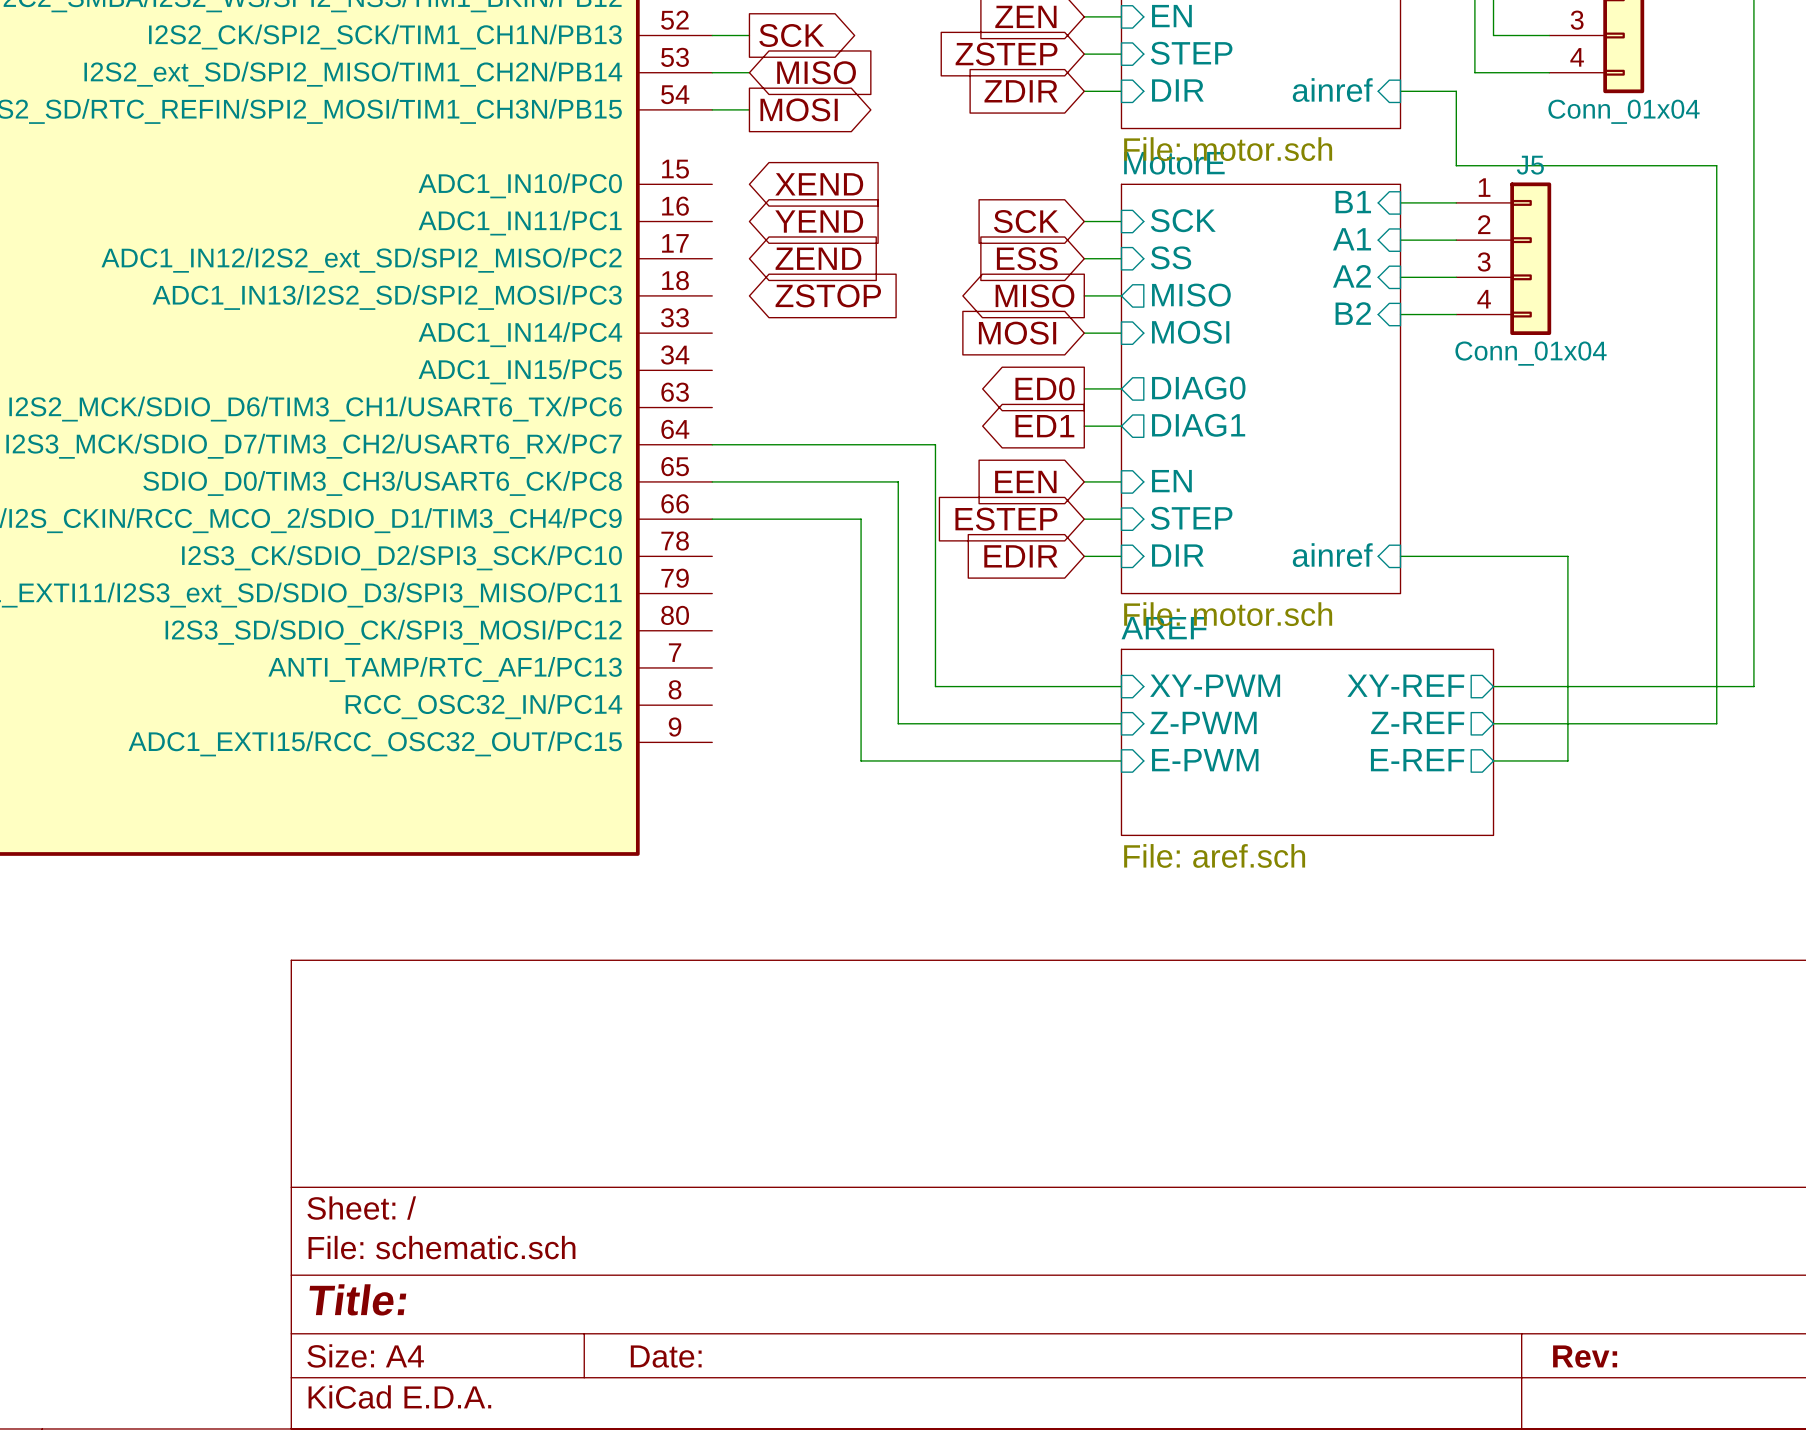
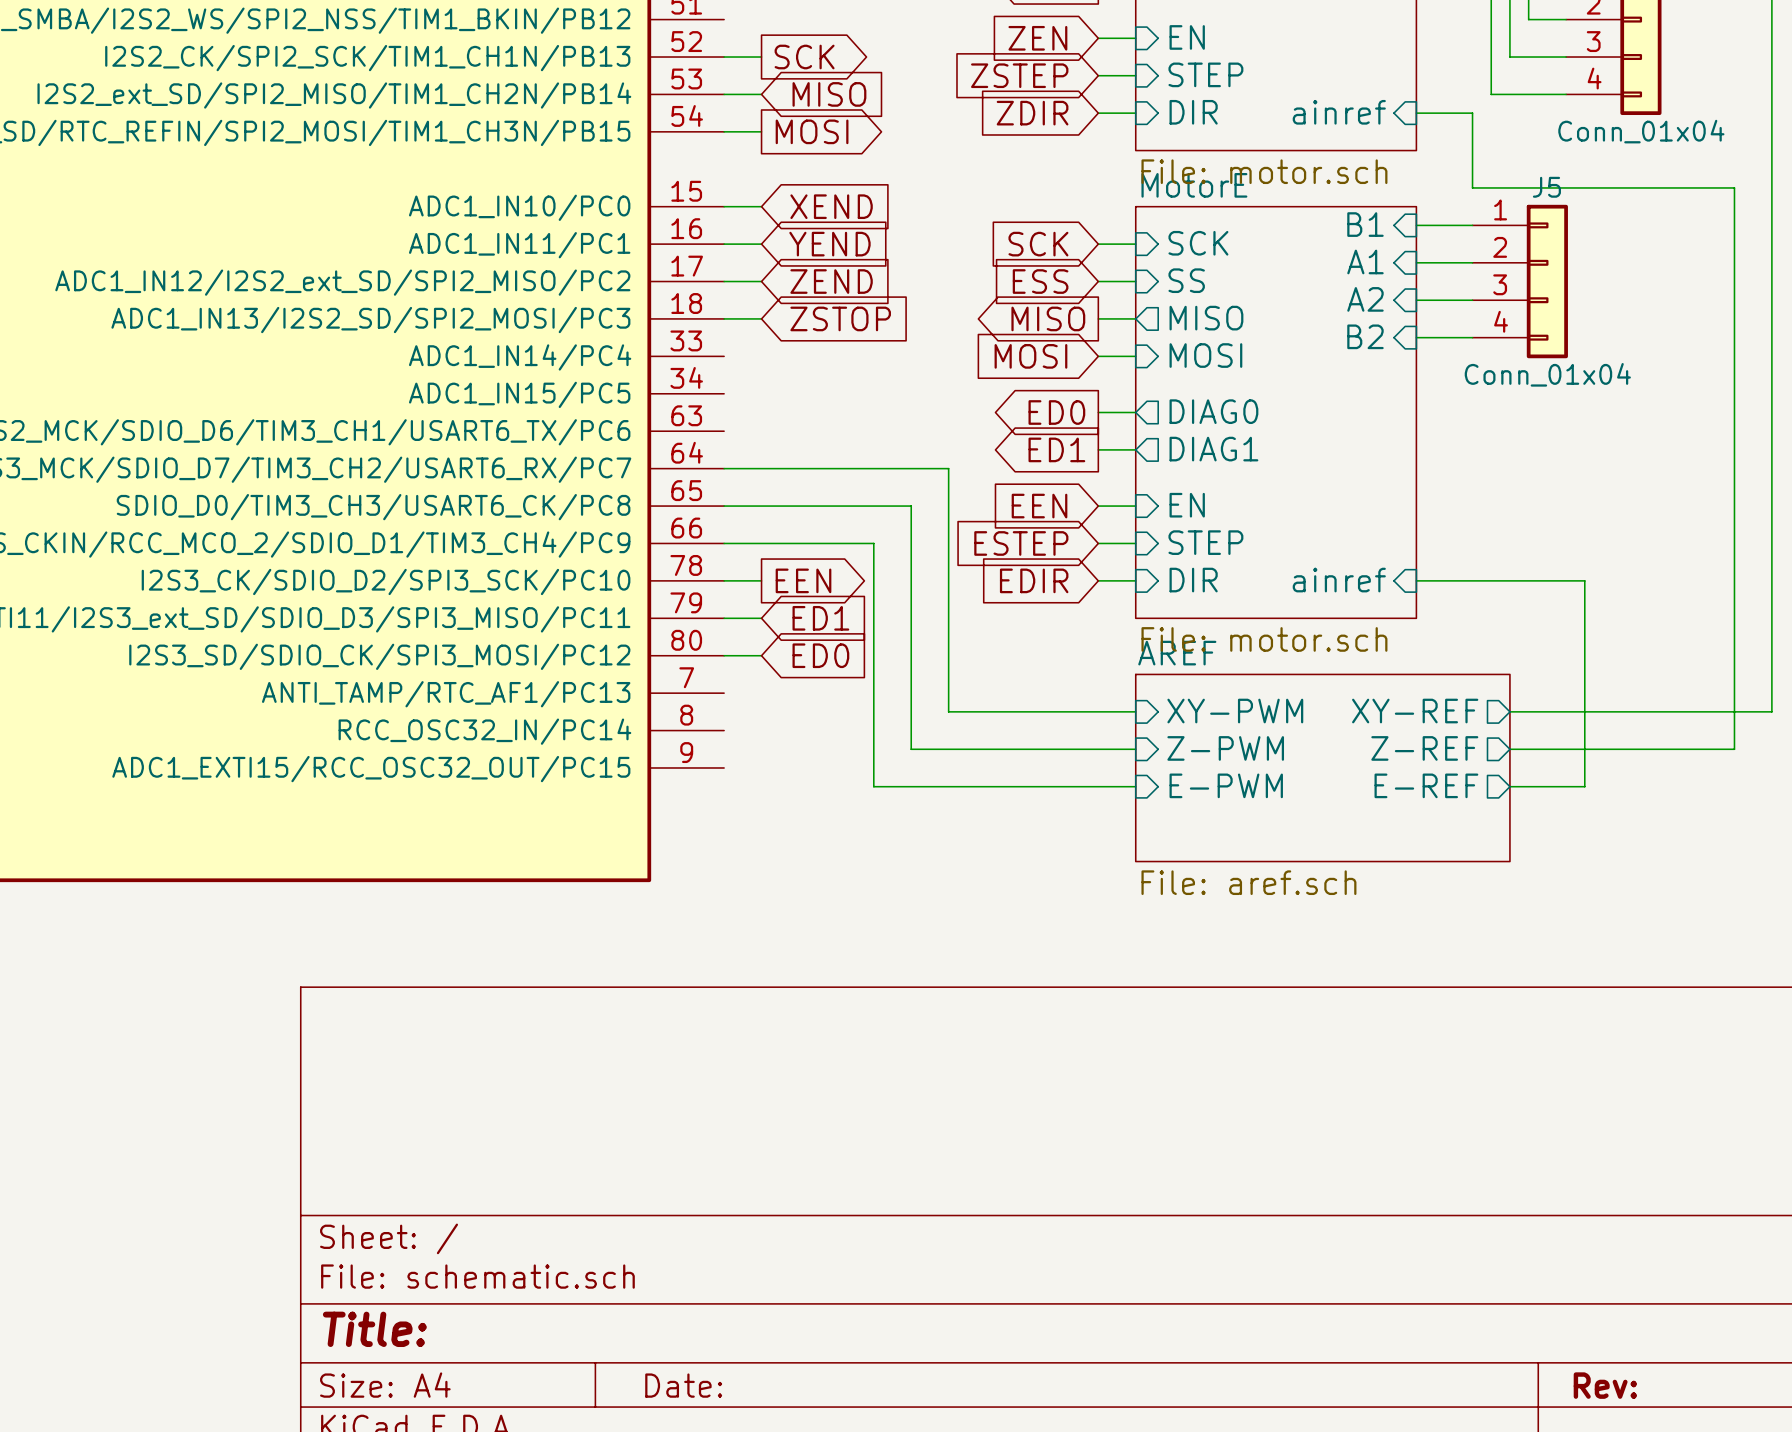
wire: none -> (724, 206) (761, 206)
wire: none -> (724, 244) (761, 244)
wire: none -> (724, 281) (761, 281)
wire: none -> (724, 318) (761, 318)
wire: none -> (724, 580) (761, 580)
global label: none -> EEN (803, 580)
wire: none -> (724, 618) (761, 618)
global label: none -> ED1 (820, 618)
wire: none -> (724, 655) (761, 655)
global label: none -> ED0 (820, 655)

